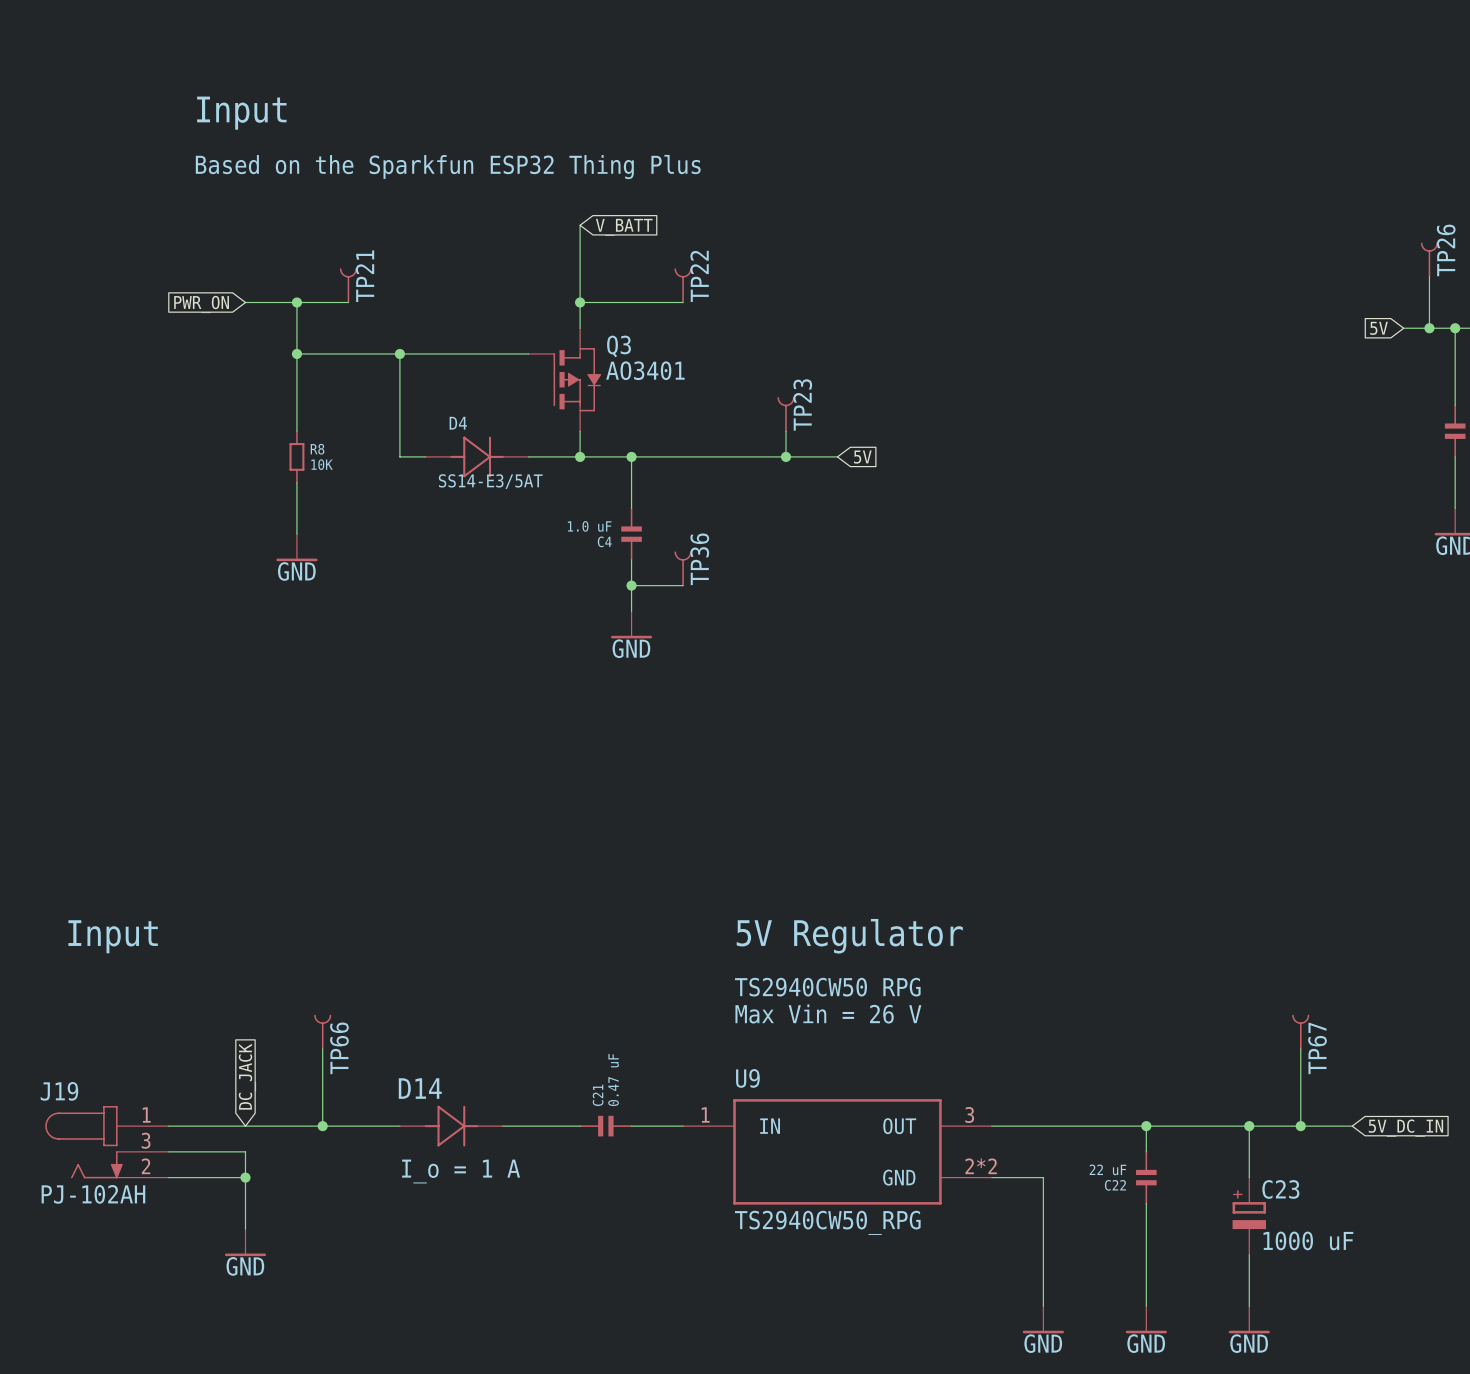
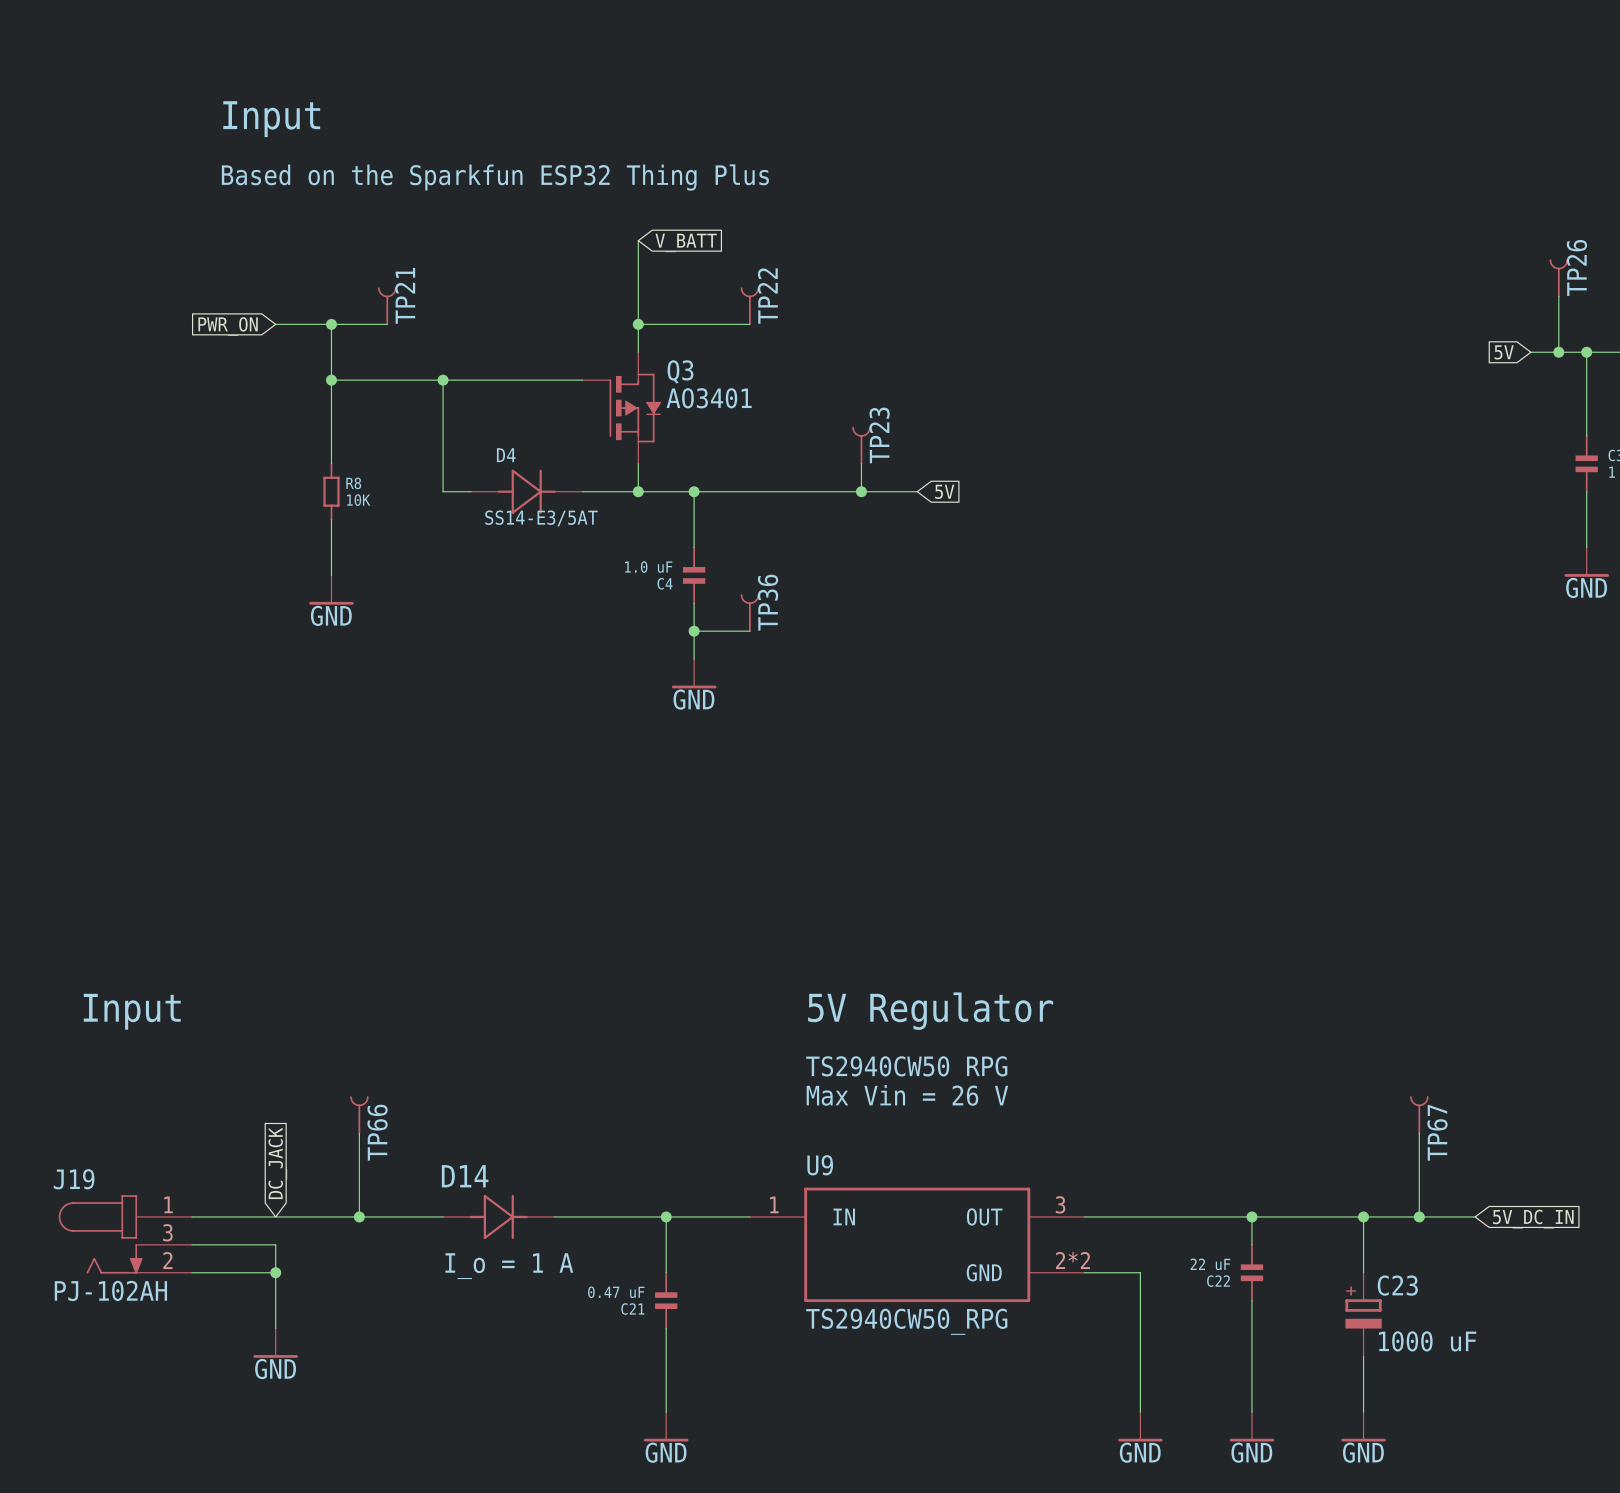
C21 value position: 0.47 uF (613, 1080) -> 0.47 uF (616, 1292)
C21 name position: C21 (598, 1095) -> C21 (632, 1309)
wire: none -> (666, 1216) (666, 1272)
C21 rotation: 0° (605, 1126) -> 90° clockwise (666, 1300)
C21 position: (605, 1126) -> (666, 1300)
junction: none -> (666, 1216)
wire: none -> (666, 1328) (666, 1412)
power symbol: none -> GND (666, 1426)

